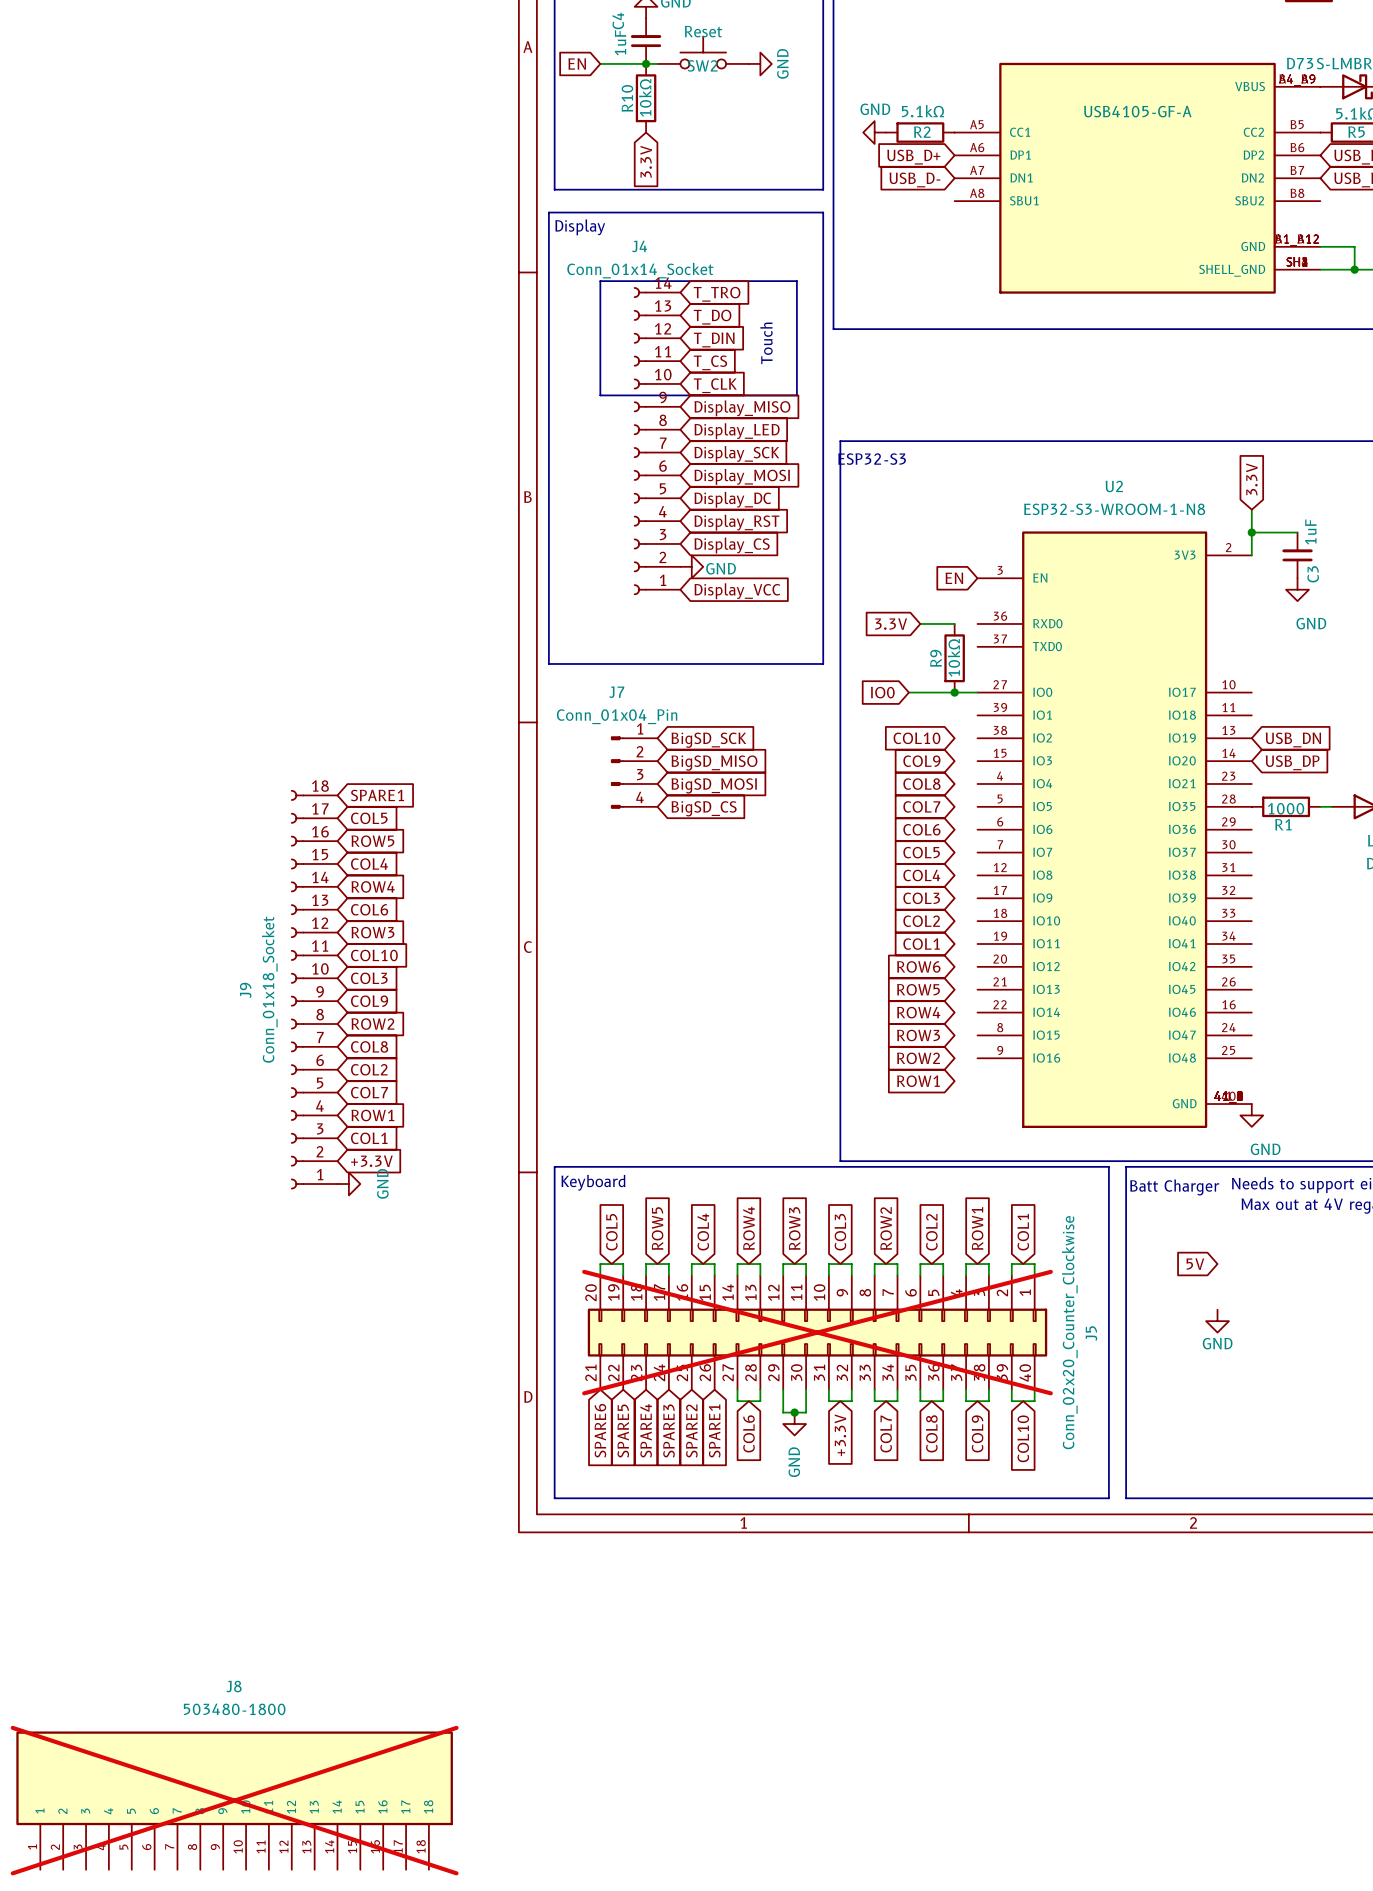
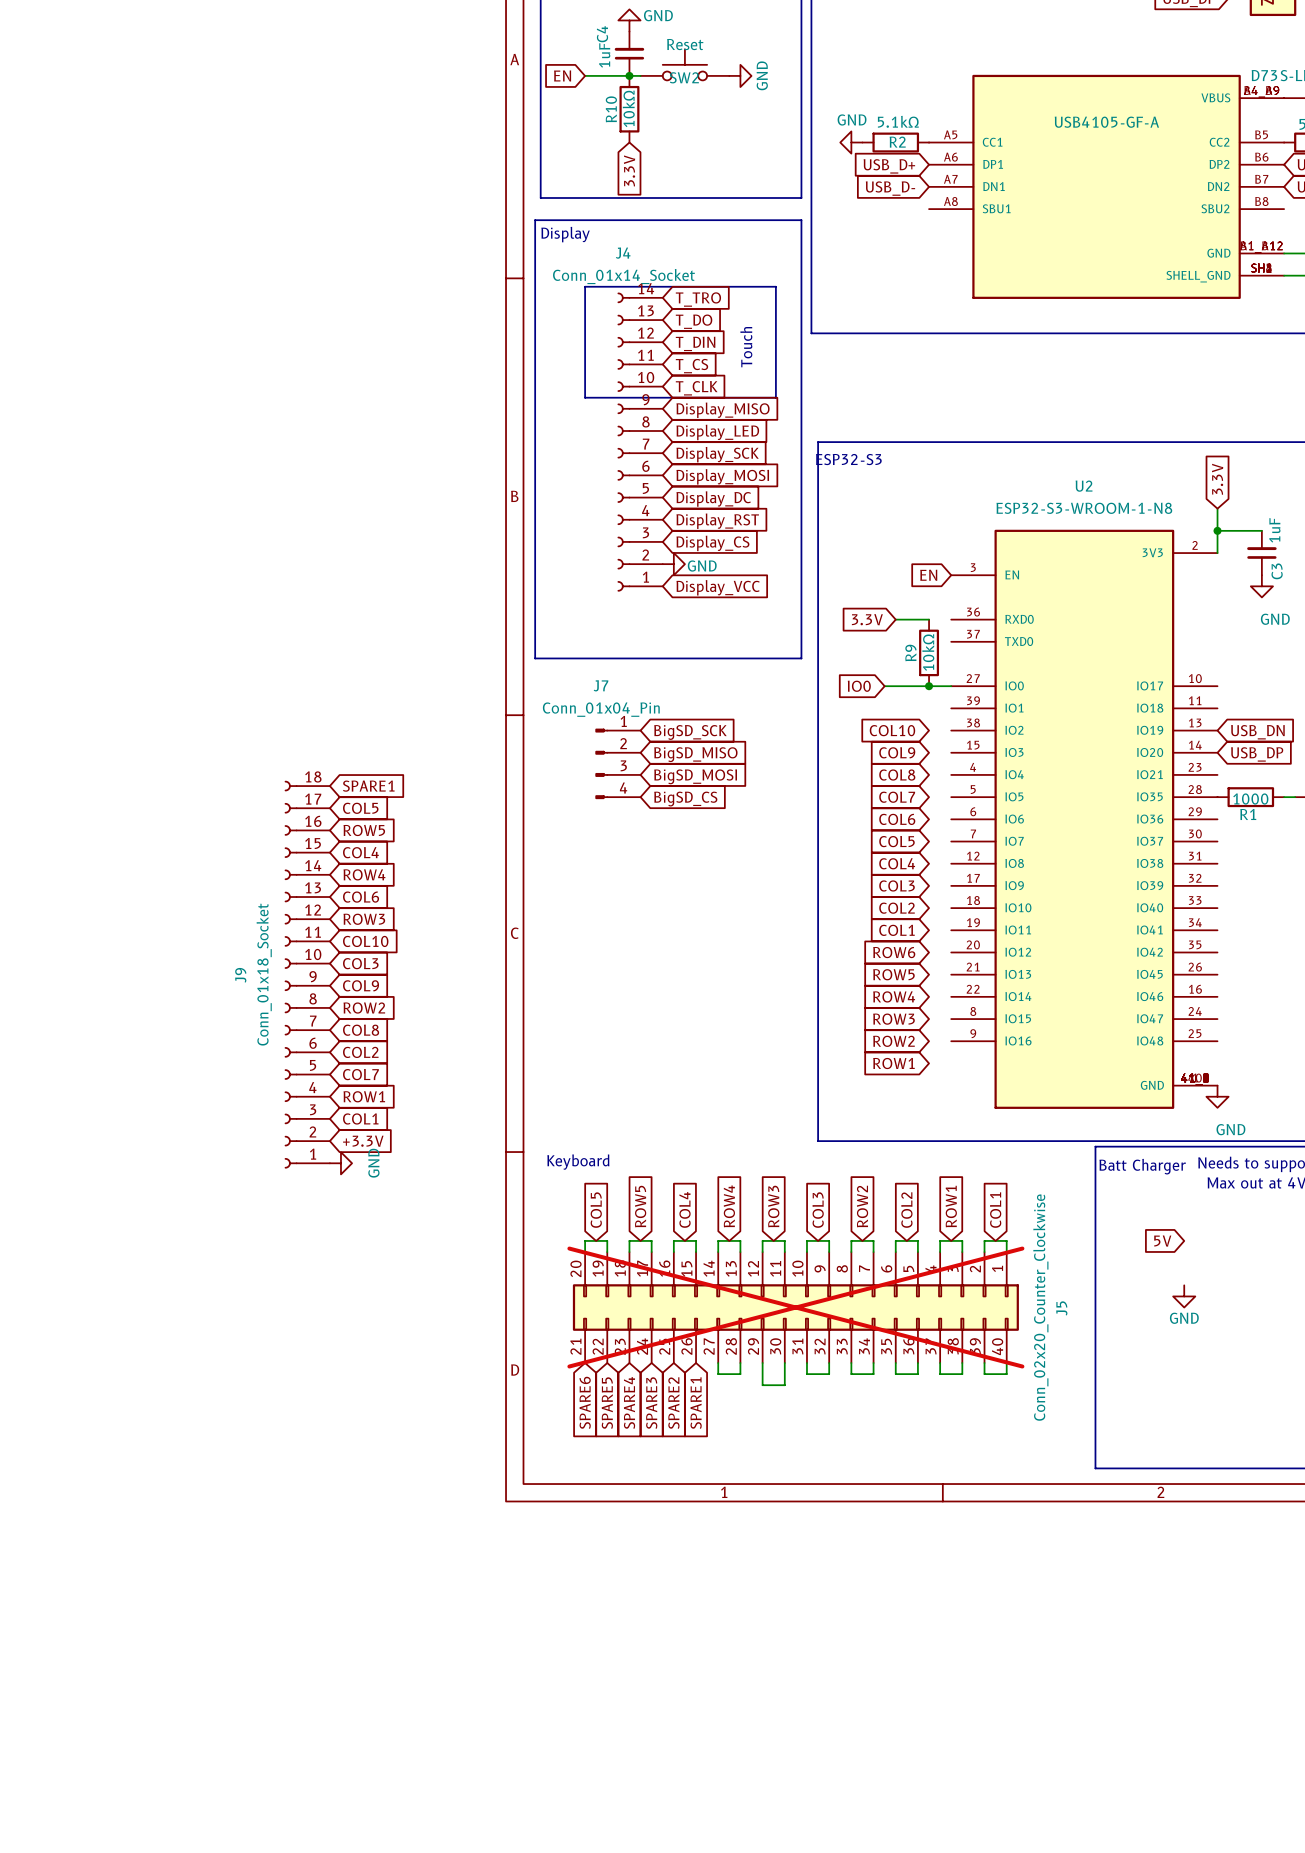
line: (554, 1166) (554, 1498) (1108, 1498) (1108, 1166) (554, 1166) -> none
junction: (794, 1412) -> none
power symbol: GND (794, 1424) -> none
global label: COL6 (748, 1433) -> none
global label: COL7 (886, 1433) -> none
global label: COL8 (931, 1433) -> none
global label: COL9 (977, 1433) -> none
global label: +3.3V (840, 1435) -> none
global label: COL10 (1023, 1438) -> none
J8: 503480-1800 (234, 1800) -> none

